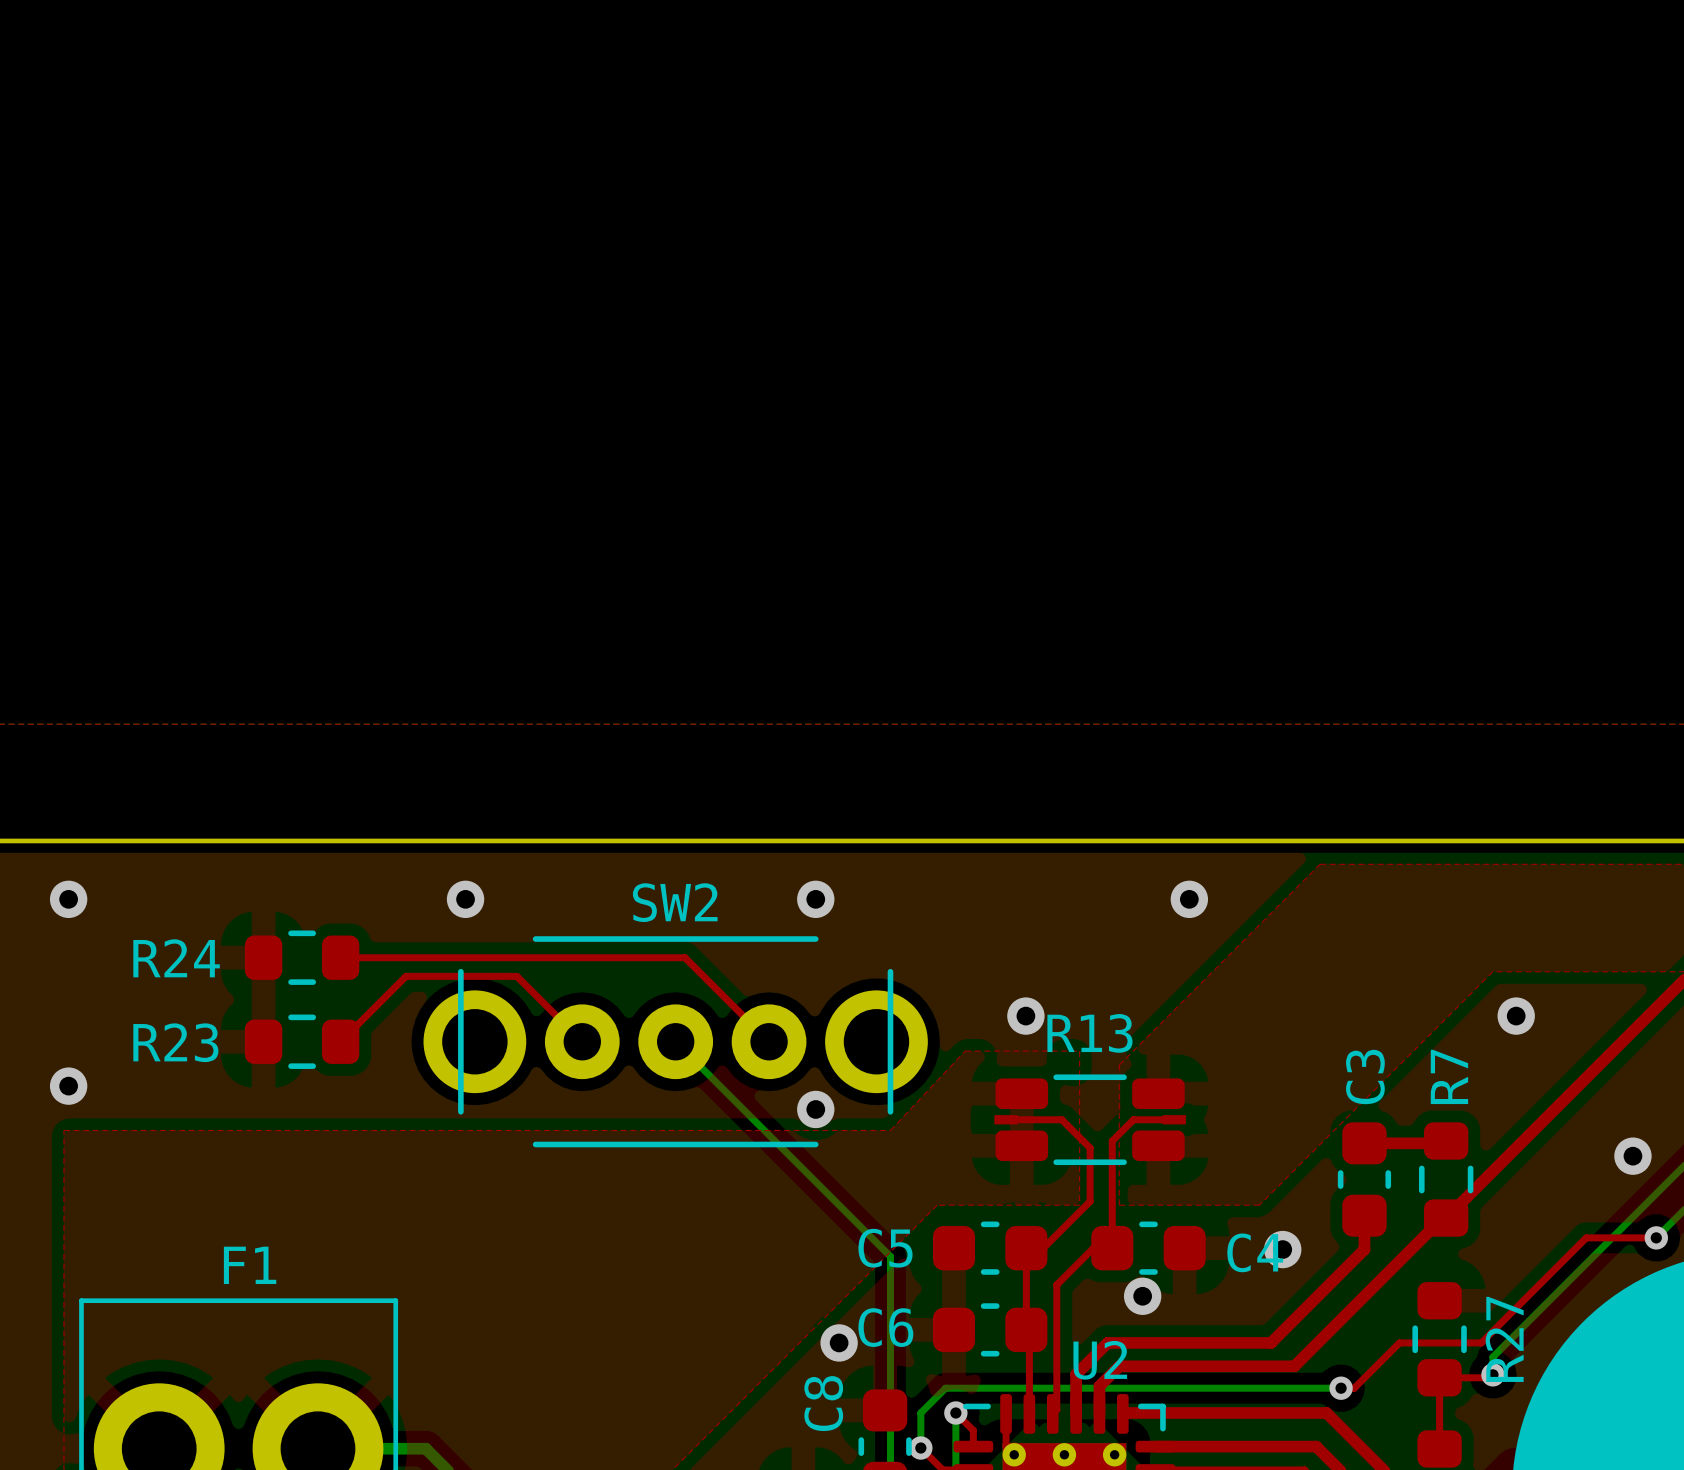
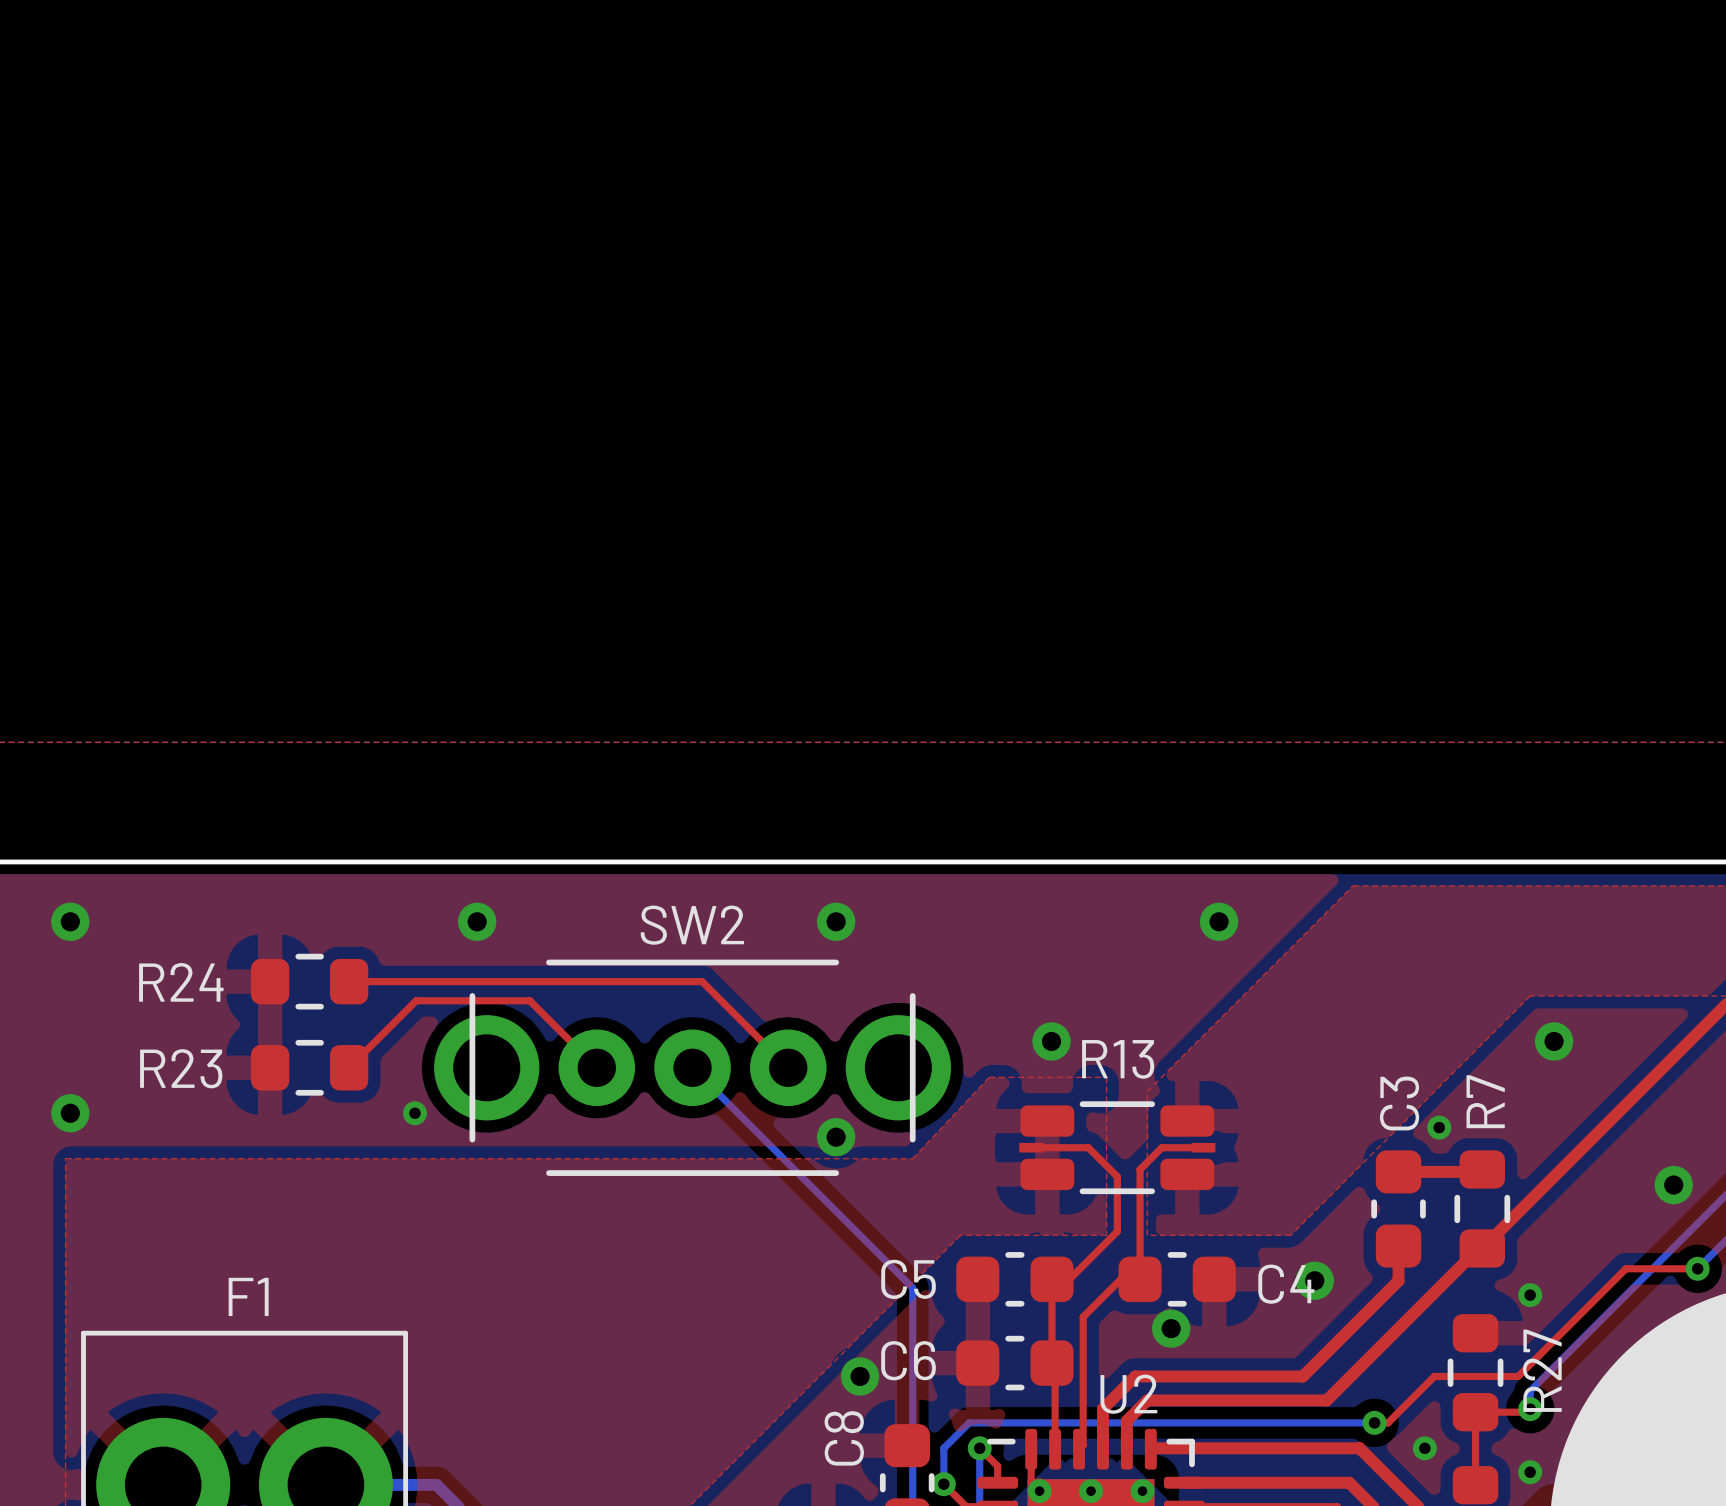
via: none -> (414, 1113)
via: none -> (1439, 1127)
via: none -> (1530, 1295)
via: none -> (1424, 1448)
via: none -> (1530, 1472)

